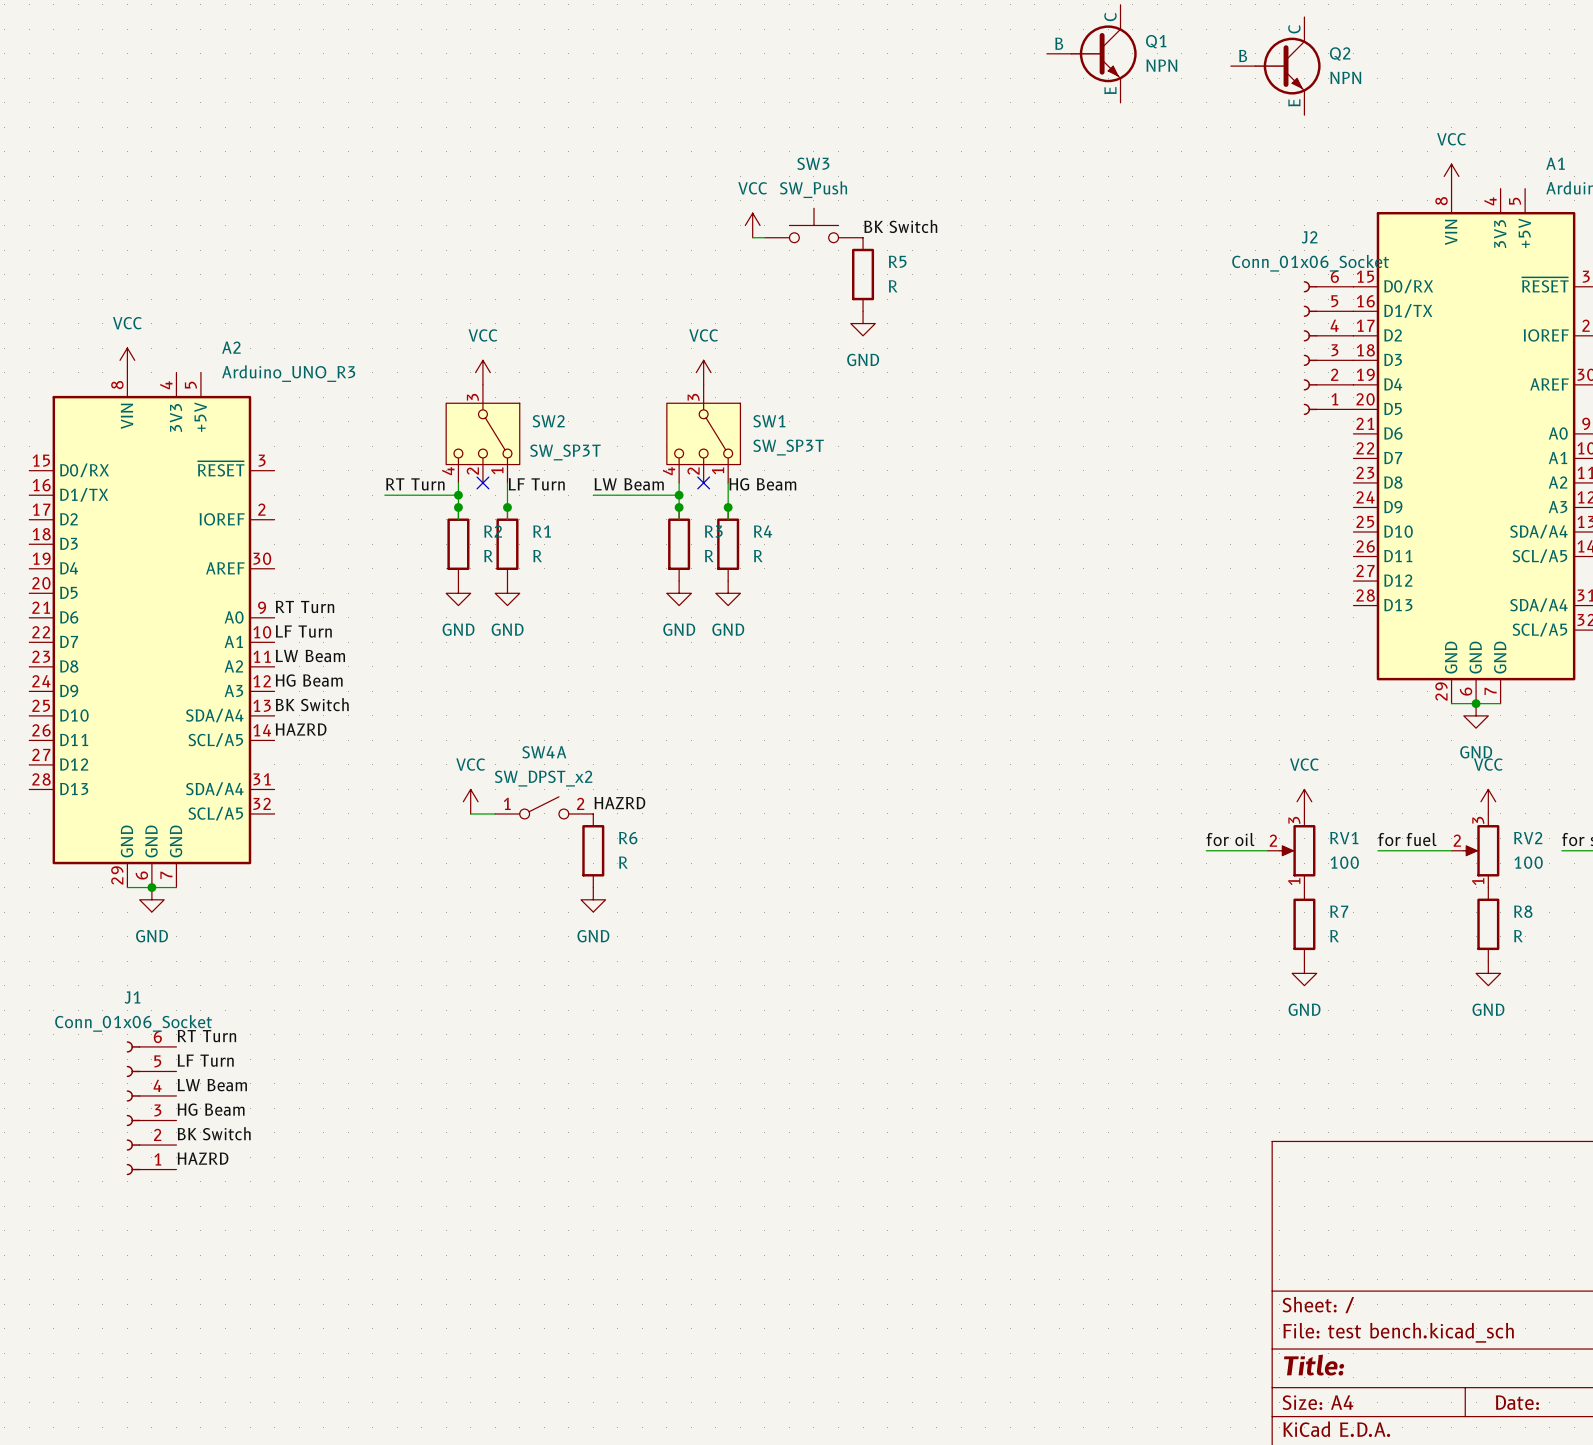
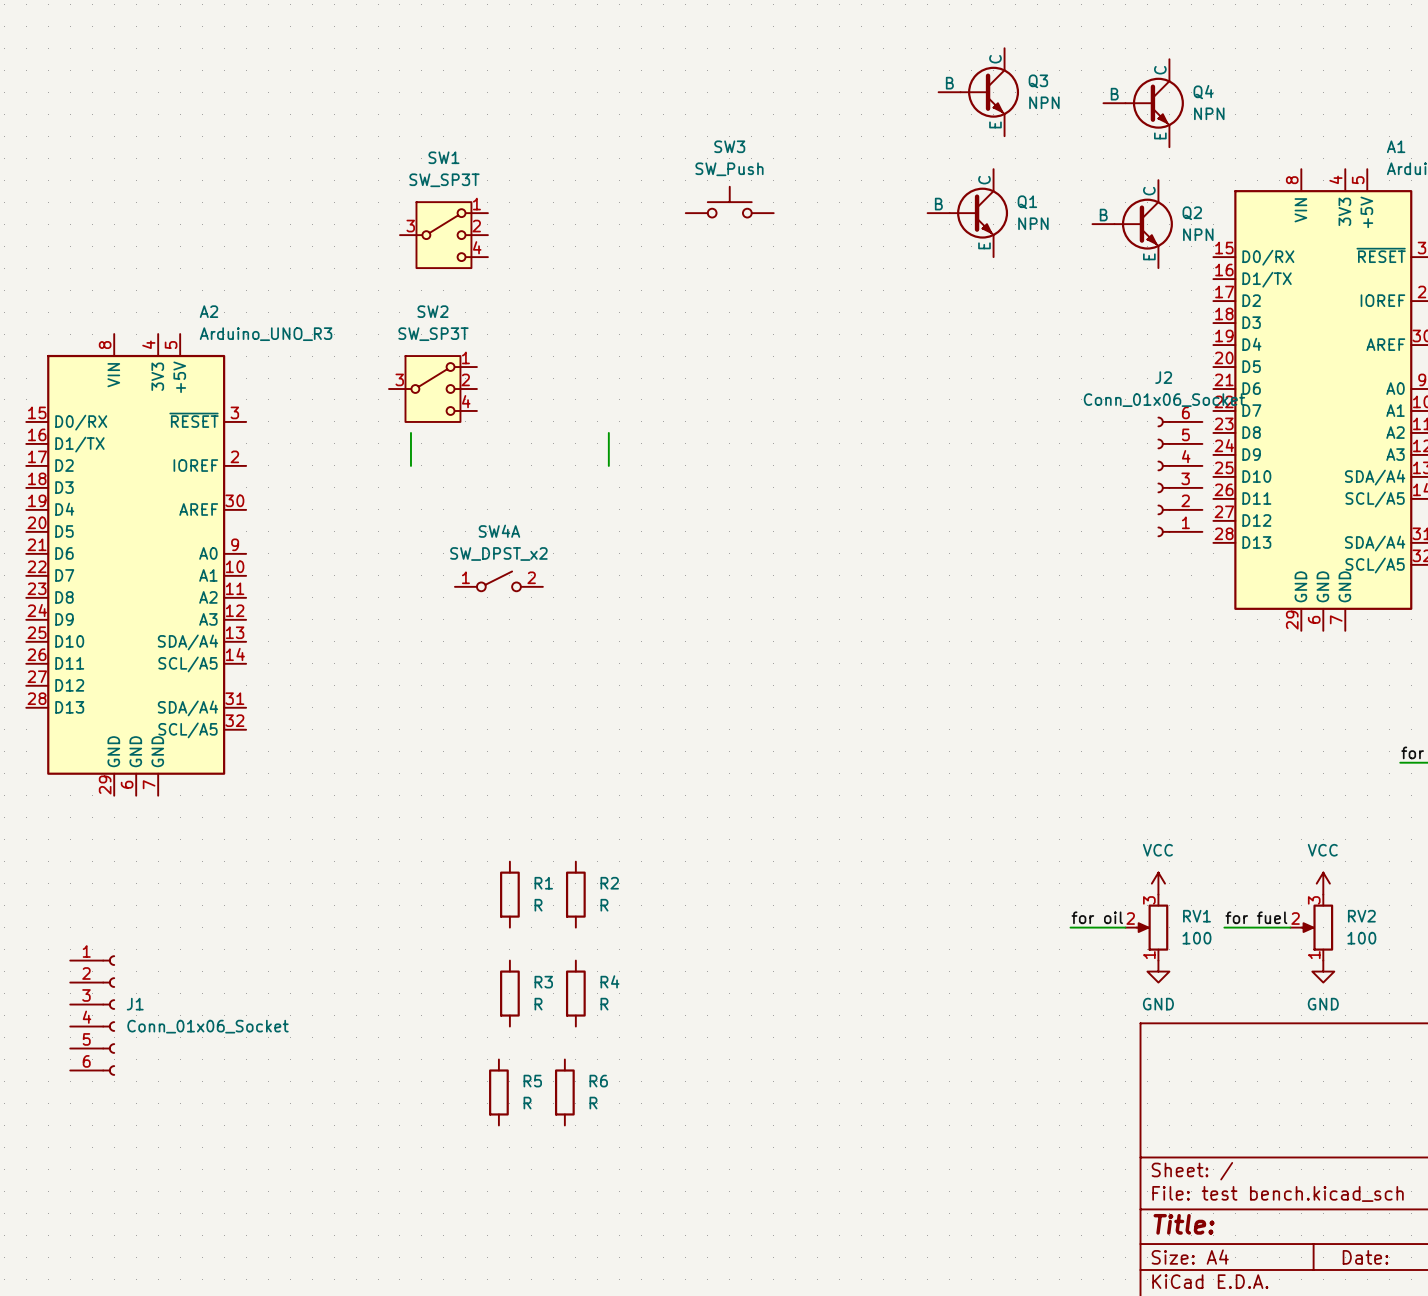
Q1 position: (1091, 53) -> (967, 213)
Q2 position: (1275, 66) -> (1132, 224)
Q3: none -> NPN (978, 92)
Q4: none -> NPN (1143, 103)
power symbol: VCC (1451, 176) -> none
power symbol: VCC (752, 225) -> none
label: BK Switch (900, 226) -> none
wire: (752, 237) (764, 237) -> none
R5 position: (863, 274) -> (498, 1092)
power symbol: GND (863, 323) -> none
J2 position: (1328, 348) -> (1180, 476)
power symbol: VCC (127, 360) -> none
power symbol: VCC (482, 372) -> none
power symbol: VCC (703, 372) -> none
SW2 rotation: 0° (482, 433) -> 90° counterclockwise (432, 389)
SW1 rotation: 0° (703, 433) -> 90° counterclockwise (443, 235)
SW1 position: (703, 433) -> (443, 235)
SW1 value position: SW_SP3T (788, 447) -> SW_SP3T (444, 180)
SW2 value position: SW_SP3T (565, 452) -> SW_SP3T (433, 334)
no-connect mark: (482, 482) -> none
wire: (507, 482) (507, 519) -> none
no-connect mark: (703, 482) -> none
wire: (728, 482) (728, 519) -> none
label: RT Turn (415, 484) -> none
label: LF Turn (536, 484) -> none
label: LW Beam (629, 484) -> none
label: HG Beam (762, 484) -> none
wire: (384, 495) (458, 495) -> none
junction: (458, 495) -> none
wire: (593, 495) (679, 495) -> none
junction: (679, 495) -> none
junction: (458, 507) -> none
junction: (507, 507) -> none
junction: (679, 507) -> none
junction: (728, 507) -> none
R2 position: (458, 544) -> (575, 894)
R1 position: (507, 544) -> (509, 894)
R3 position: (679, 544) -> (509, 993)
R4 position: (728, 544) -> (575, 993)
power symbol: GND (458, 593) -> none
power symbol: GND (507, 593) -> none
power symbol: GND (679, 593) -> none
power symbol: GND (728, 593) -> none
label: RT Turn (304, 606) -> none
label: LF Turn (303, 631) -> none
label: LW Beam (310, 655) -> none
label: HG Beam (309, 680) -> none
wire: (1451, 703) (1500, 703) -> none
junction: (1476, 703) -> none
label: BK Switch (312, 704) -> none
power symbol: GND (1476, 715) -> none
label: HAZRD (301, 729) -> none
power symbol: VCC (470, 801) -> none
power symbol: VCC (1304, 801) -> none
power symbol: VCC (1488, 801) -> none
label: HAZRD (619, 803) -> none
SW4A position: (544, 807) -> (498, 581)
wire: (470, 813) (495, 813) -> none
label position: for oil (1230, 839) -> for oil (1097, 917)
label position: for fuel (1407, 839) -> for fuel (1256, 917)
R6 position: (593, 850) -> (564, 1092)
wire: (1206, 850) (1267, 850) -> (1070, 927) (1125, 927)
RV1 position: (1291, 850) -> (1146, 927)
wire: (1377, 850) (1451, 850) -> (1224, 927) (1290, 927)
RV2 position: (1475, 850) -> (1311, 927)
wire: (127, 887) (176, 887) -> none
junction: (151, 887) -> none
power symbol: GND (151, 899) -> none
power symbol: GND (593, 899) -> none
R7: R (1304, 924) -> none
R8: R (1488, 924) -> none
power symbol: GND (1304, 973) -> none
power symbol: GND (1488, 973) -> none
power symbol: none -> VCC (1158, 883)
power symbol: none -> VCC (1323, 883)
J1 name position: J1 (132, 997) -> J1 (135, 1004)
J1 value position: Conn_01x06_Socket (133, 1023) -> Conn_01x06_Socket (207, 1026)
label: RT Turn (206, 1036) -> none
label: LF Turn (205, 1060) -> none
power symbol: none -> GND (1158, 971)
power symbol: none -> GND (1323, 971)
label: LW Beam (212, 1085) -> none
J1 rotation: 0° (133, 1108) -> 180° (108, 1015)
label: HG Beam (211, 1109) -> none
label: BK Switch (214, 1133) -> none
label: HAZRD (203, 1158) -> none

